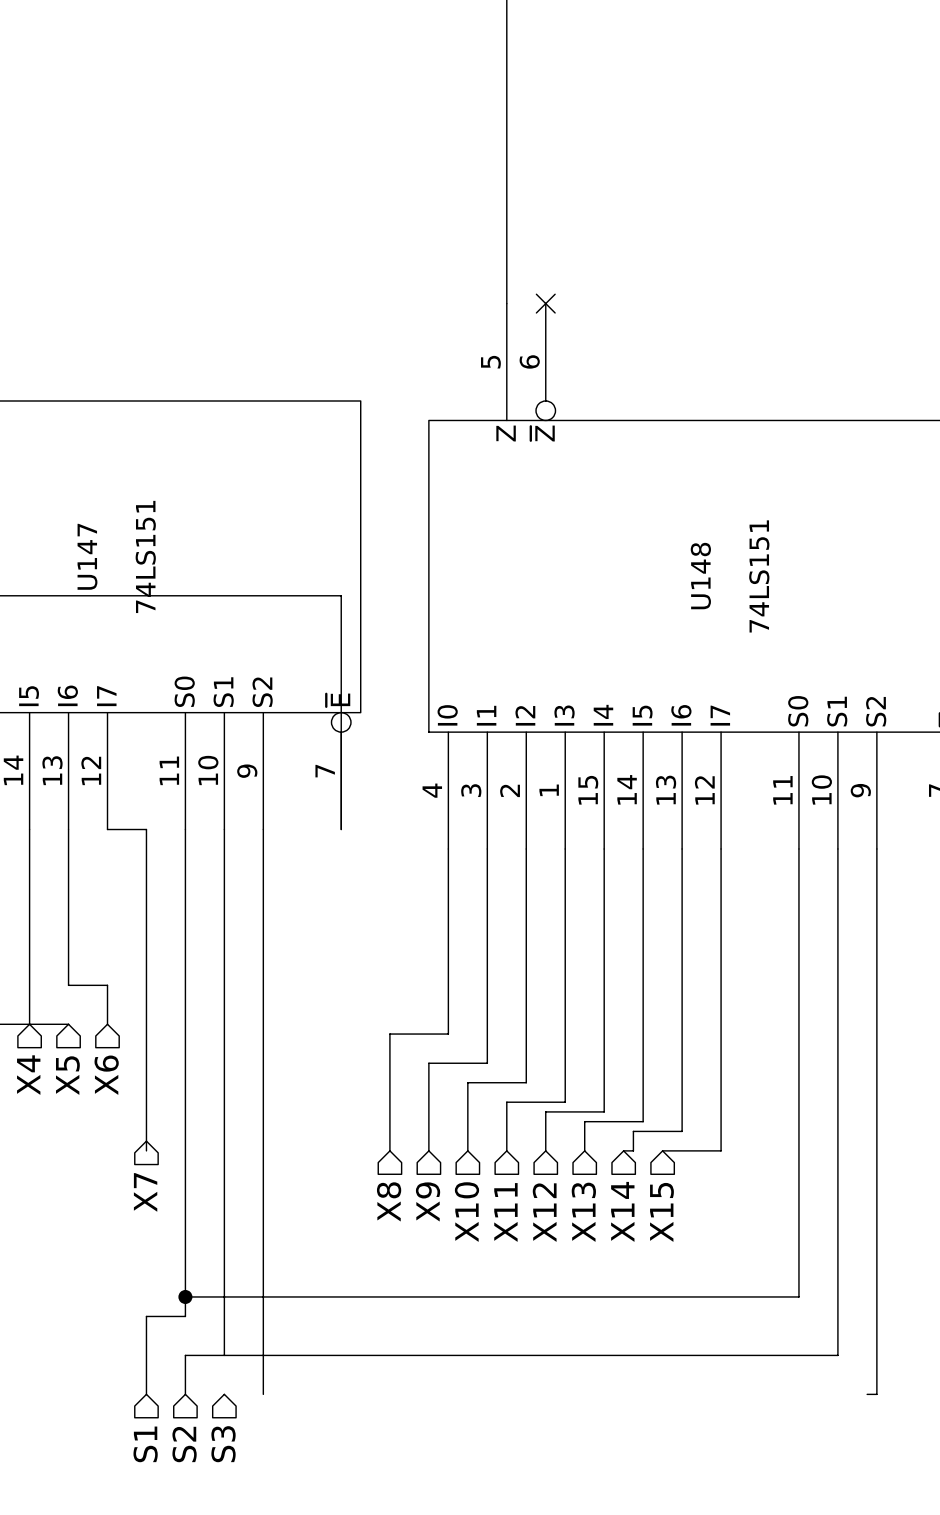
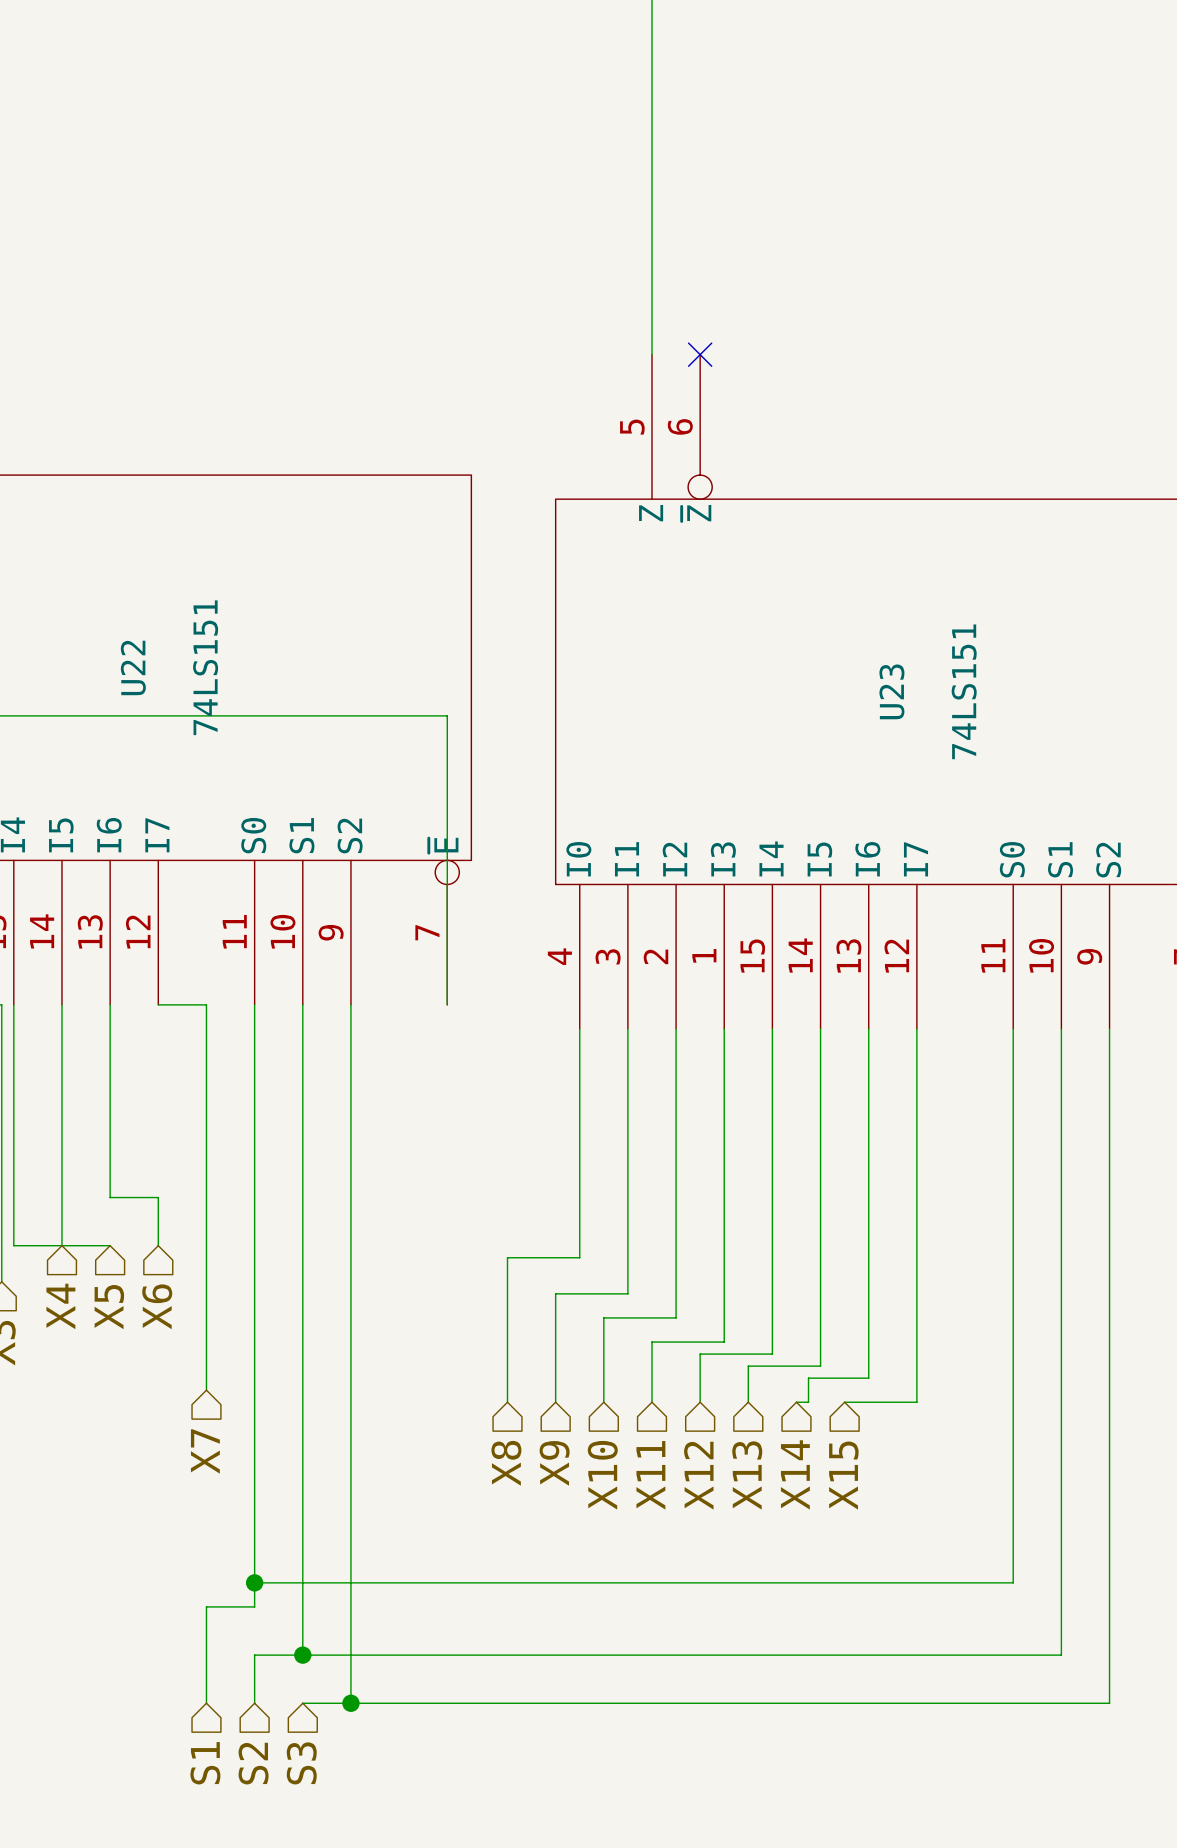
U147 name: U147 (87, 556) -> U22 (133, 667)
U148 name: U148 (700, 576) -> U23 (891, 691)
wire: (146, 1141) (146, 1150) -> none
junction: none -> (302, 1655)
wire: none -> (302, 1703) (1097, 1703)
junction: none -> (350, 1703)

